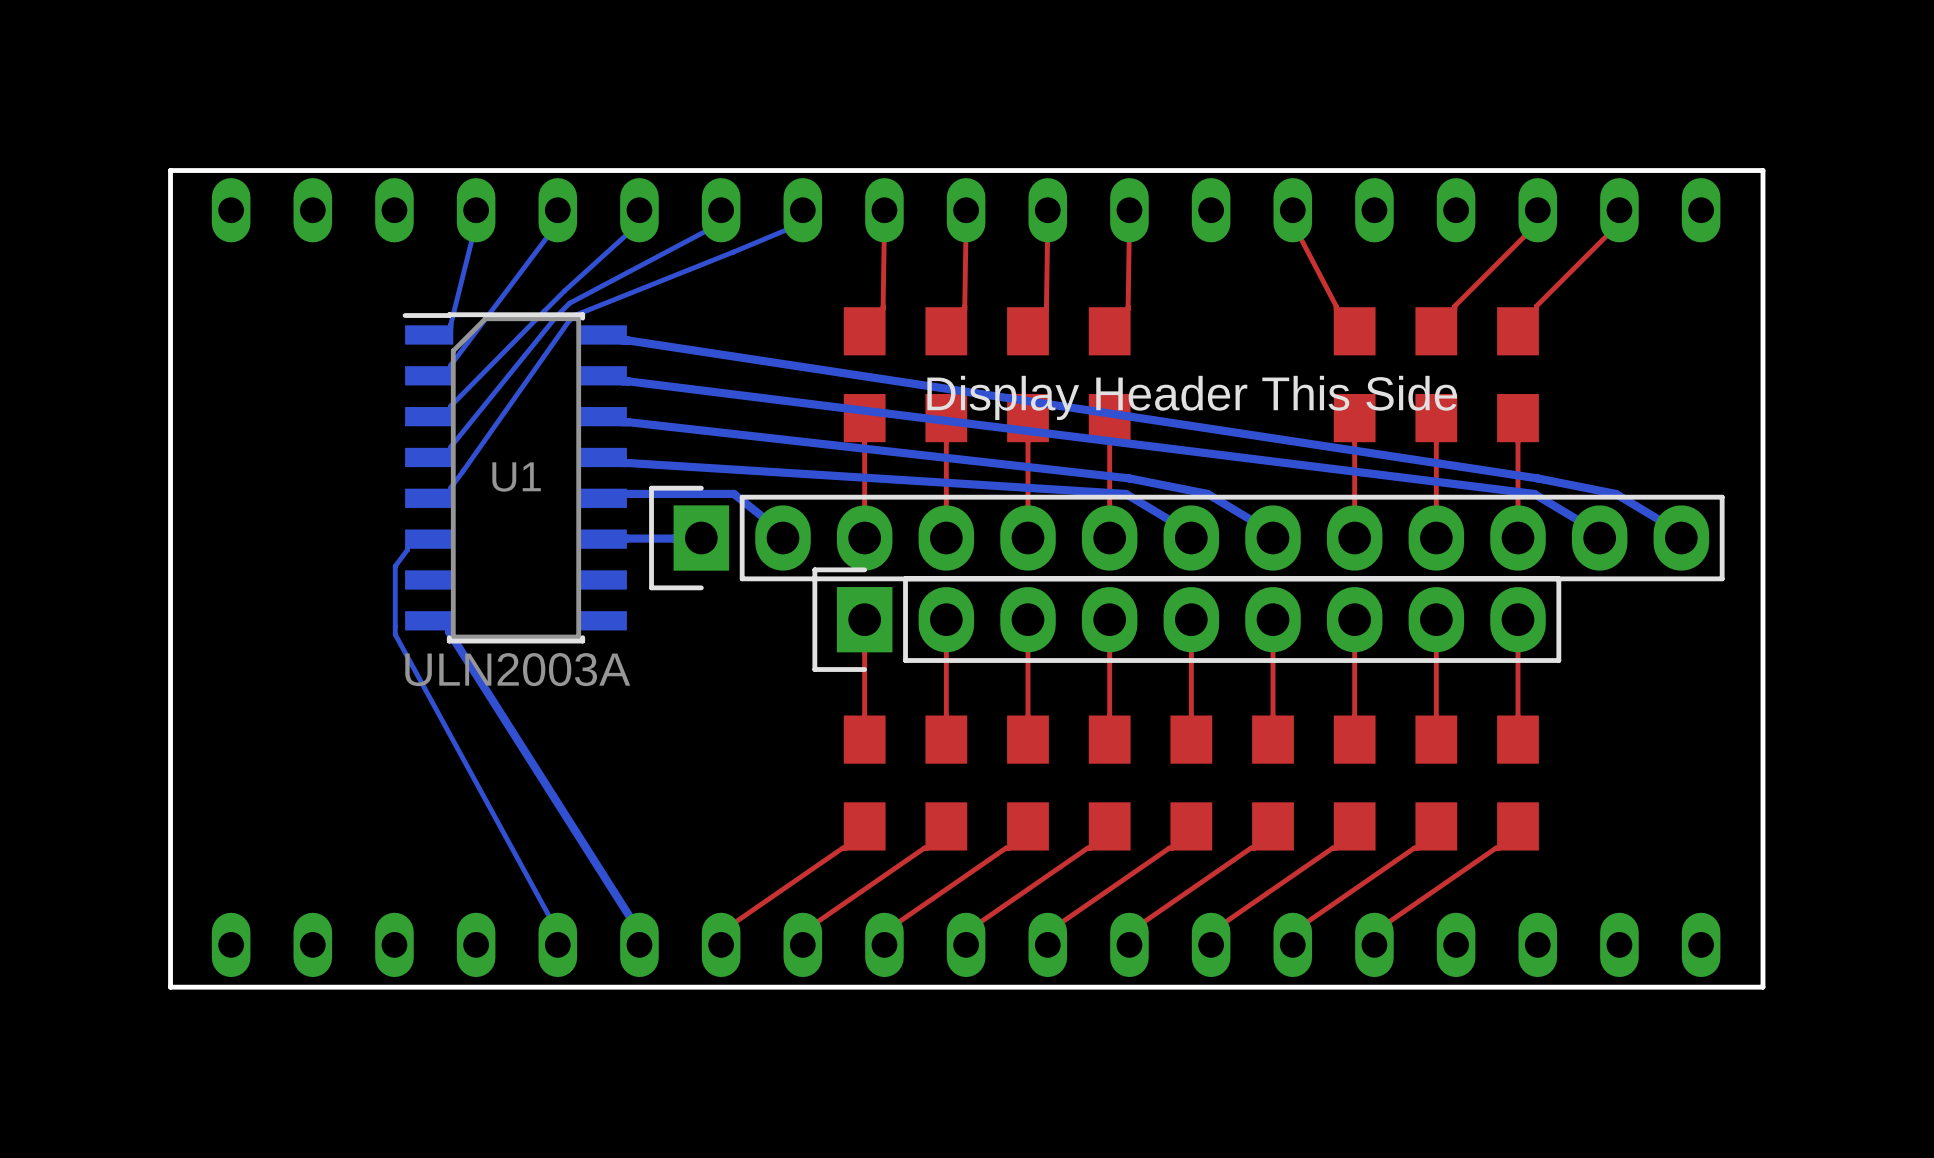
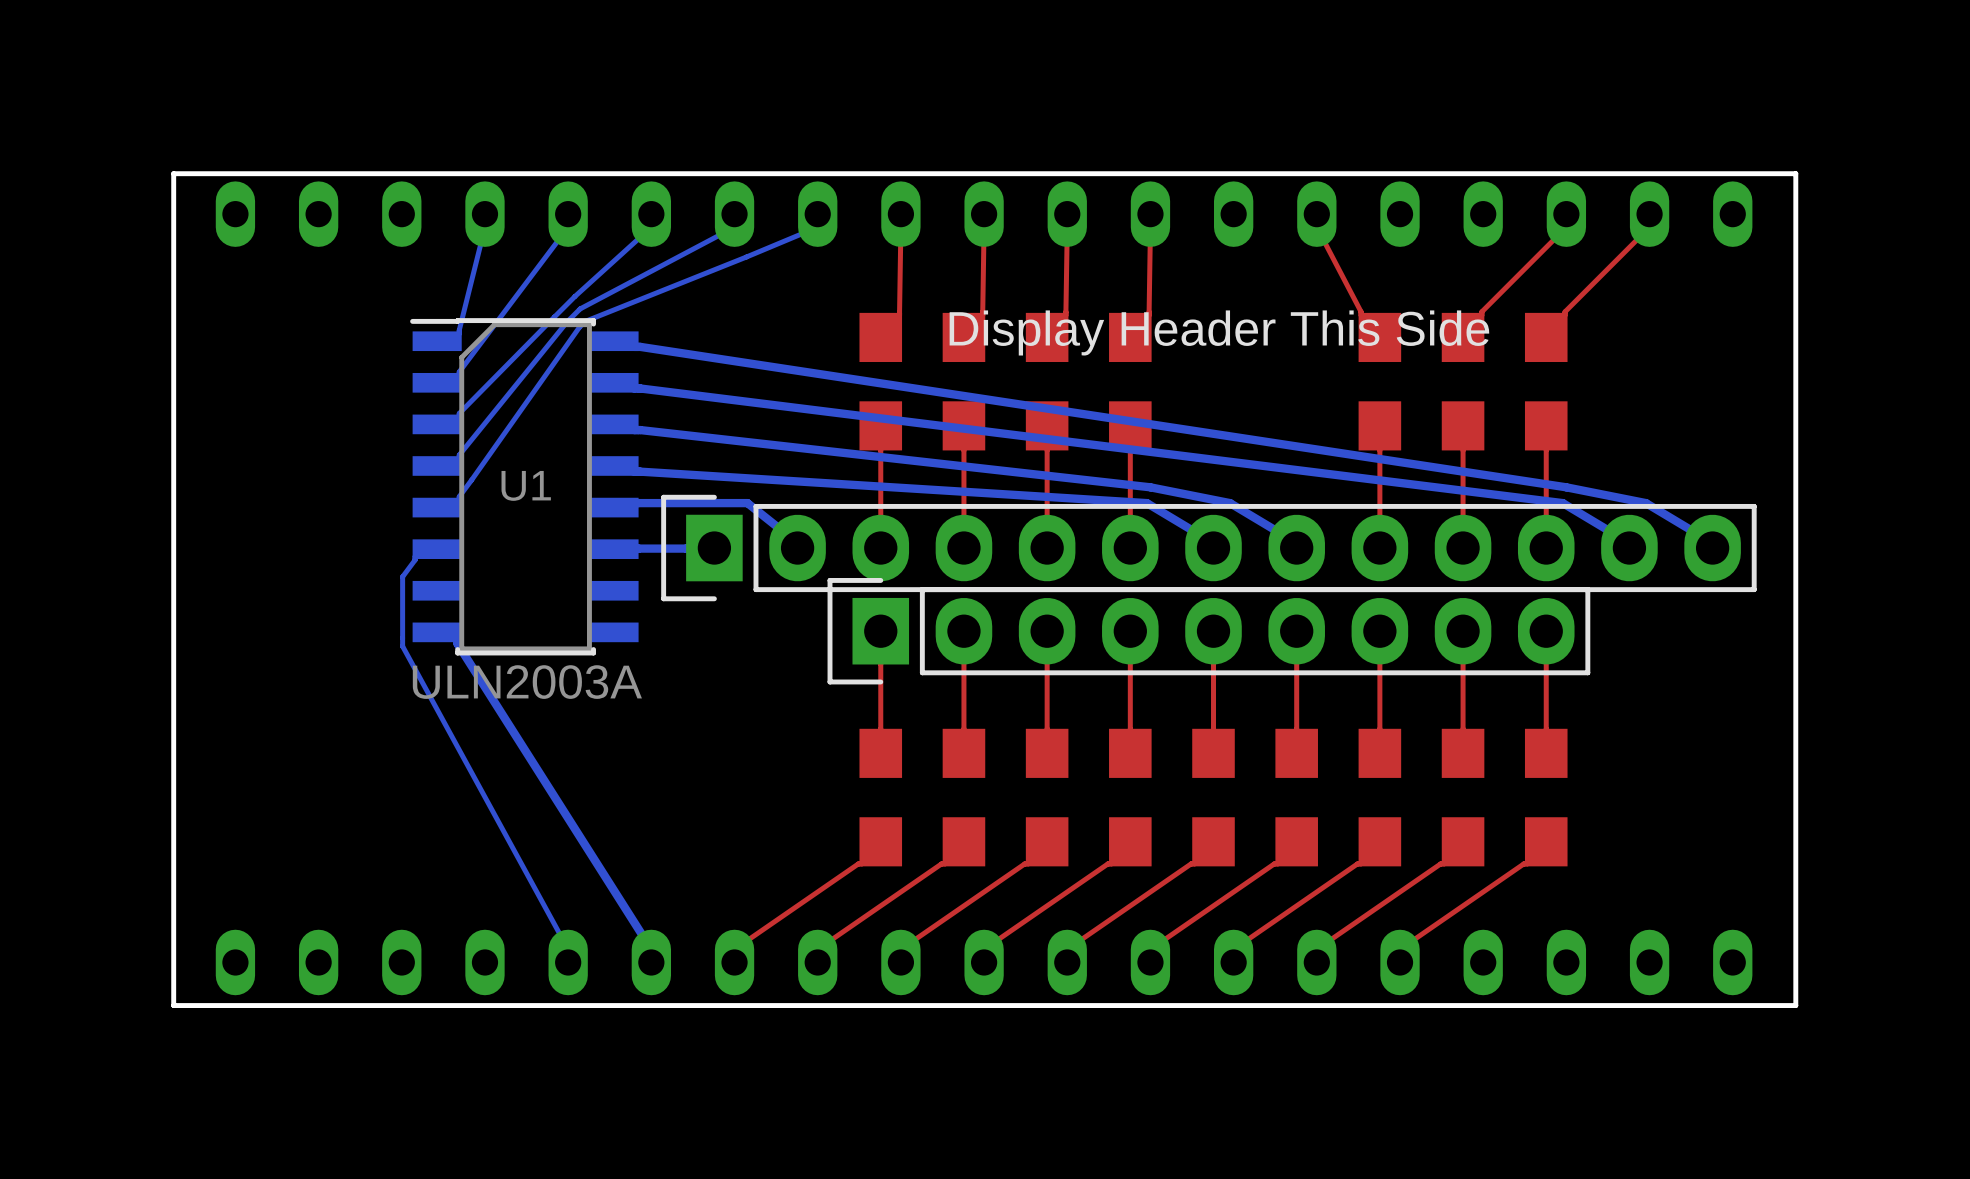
text position: Display Header This Side (1192, 397) -> Display Header This Side (1219, 332)

